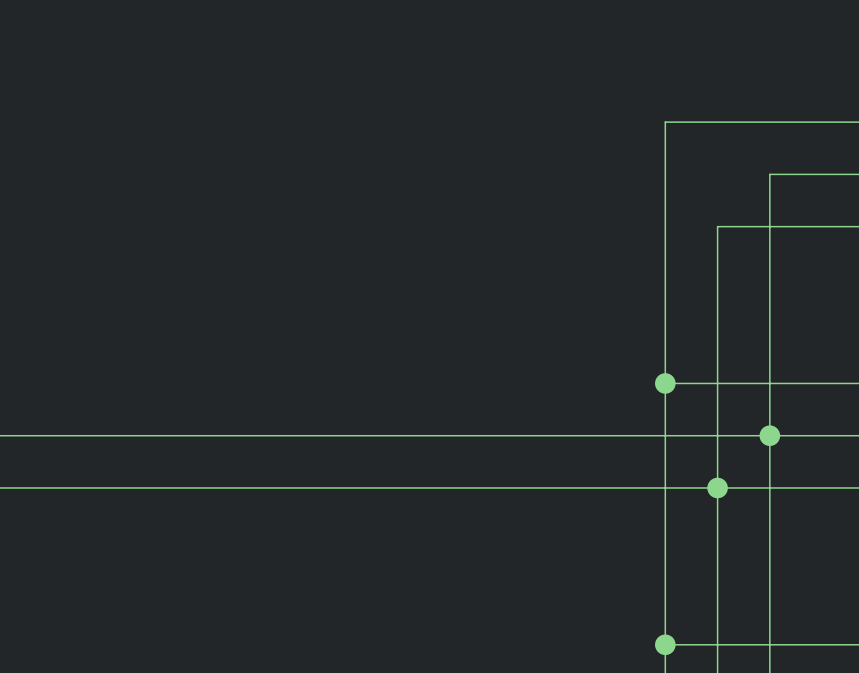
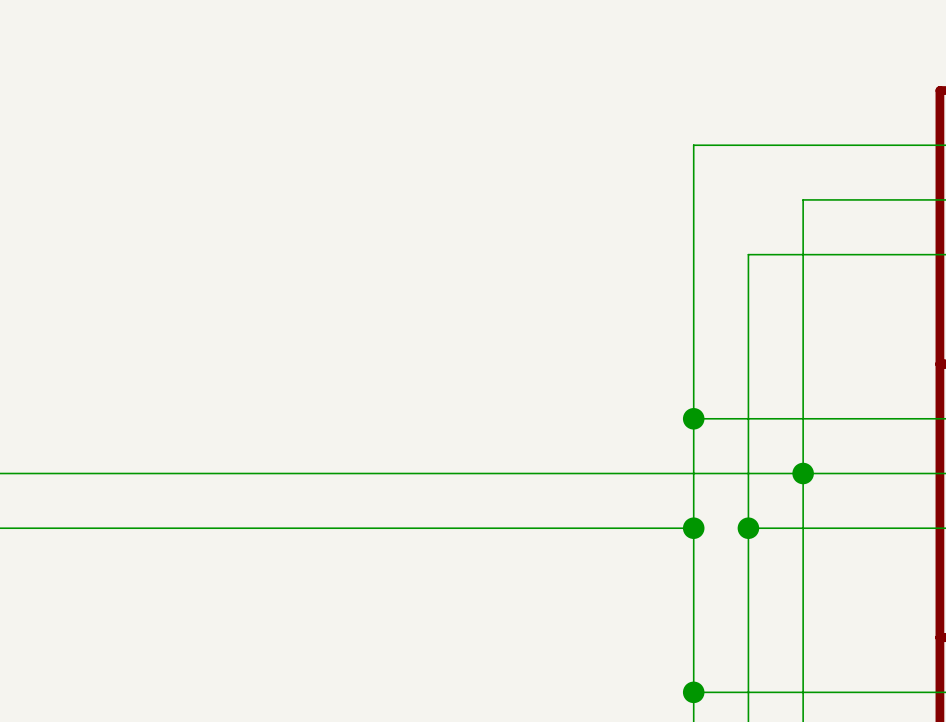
wire: (665, 487) (717, 487) -> none
junction: none -> (693, 528)

